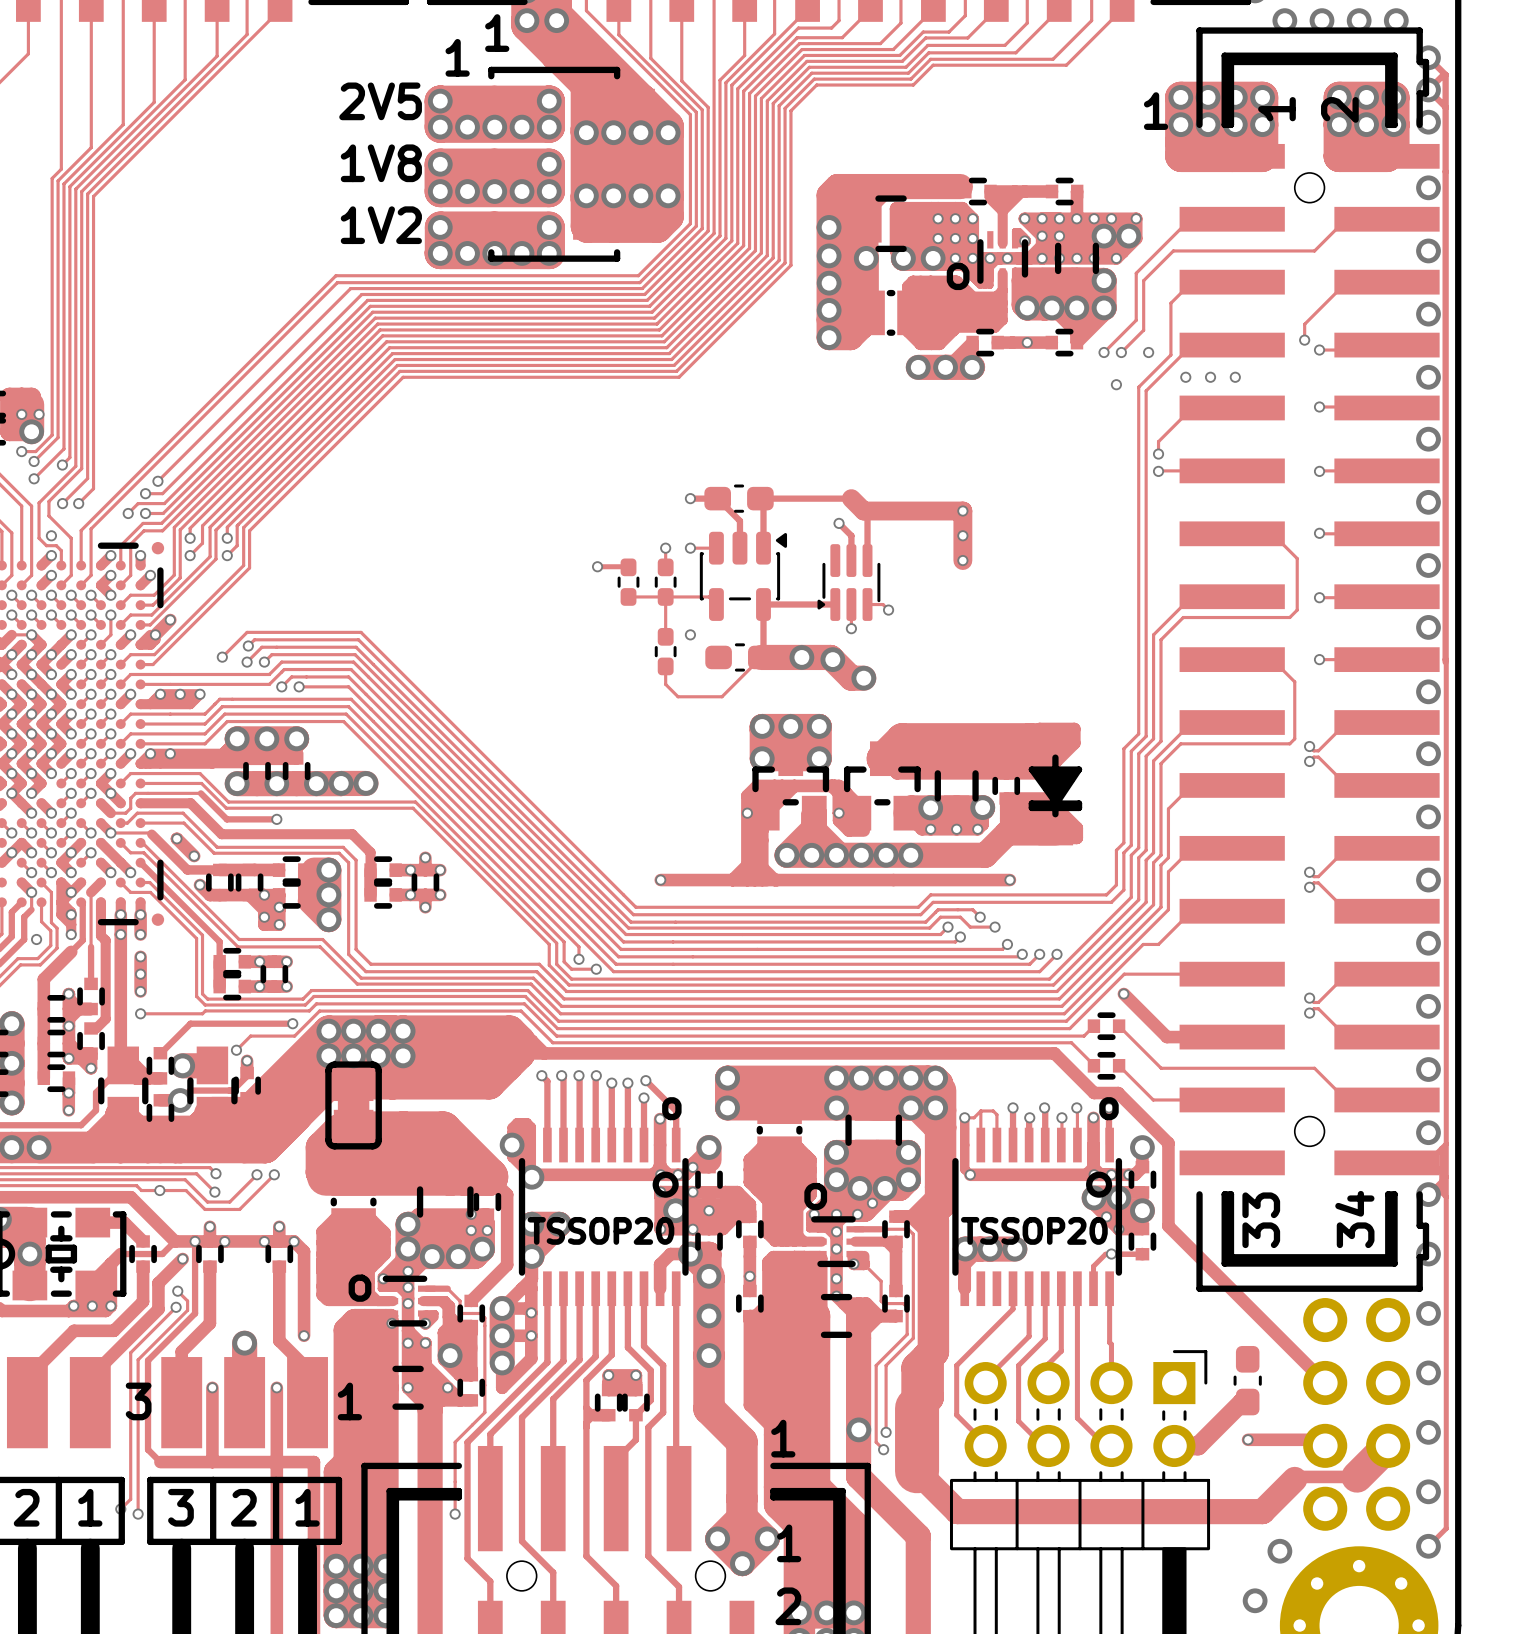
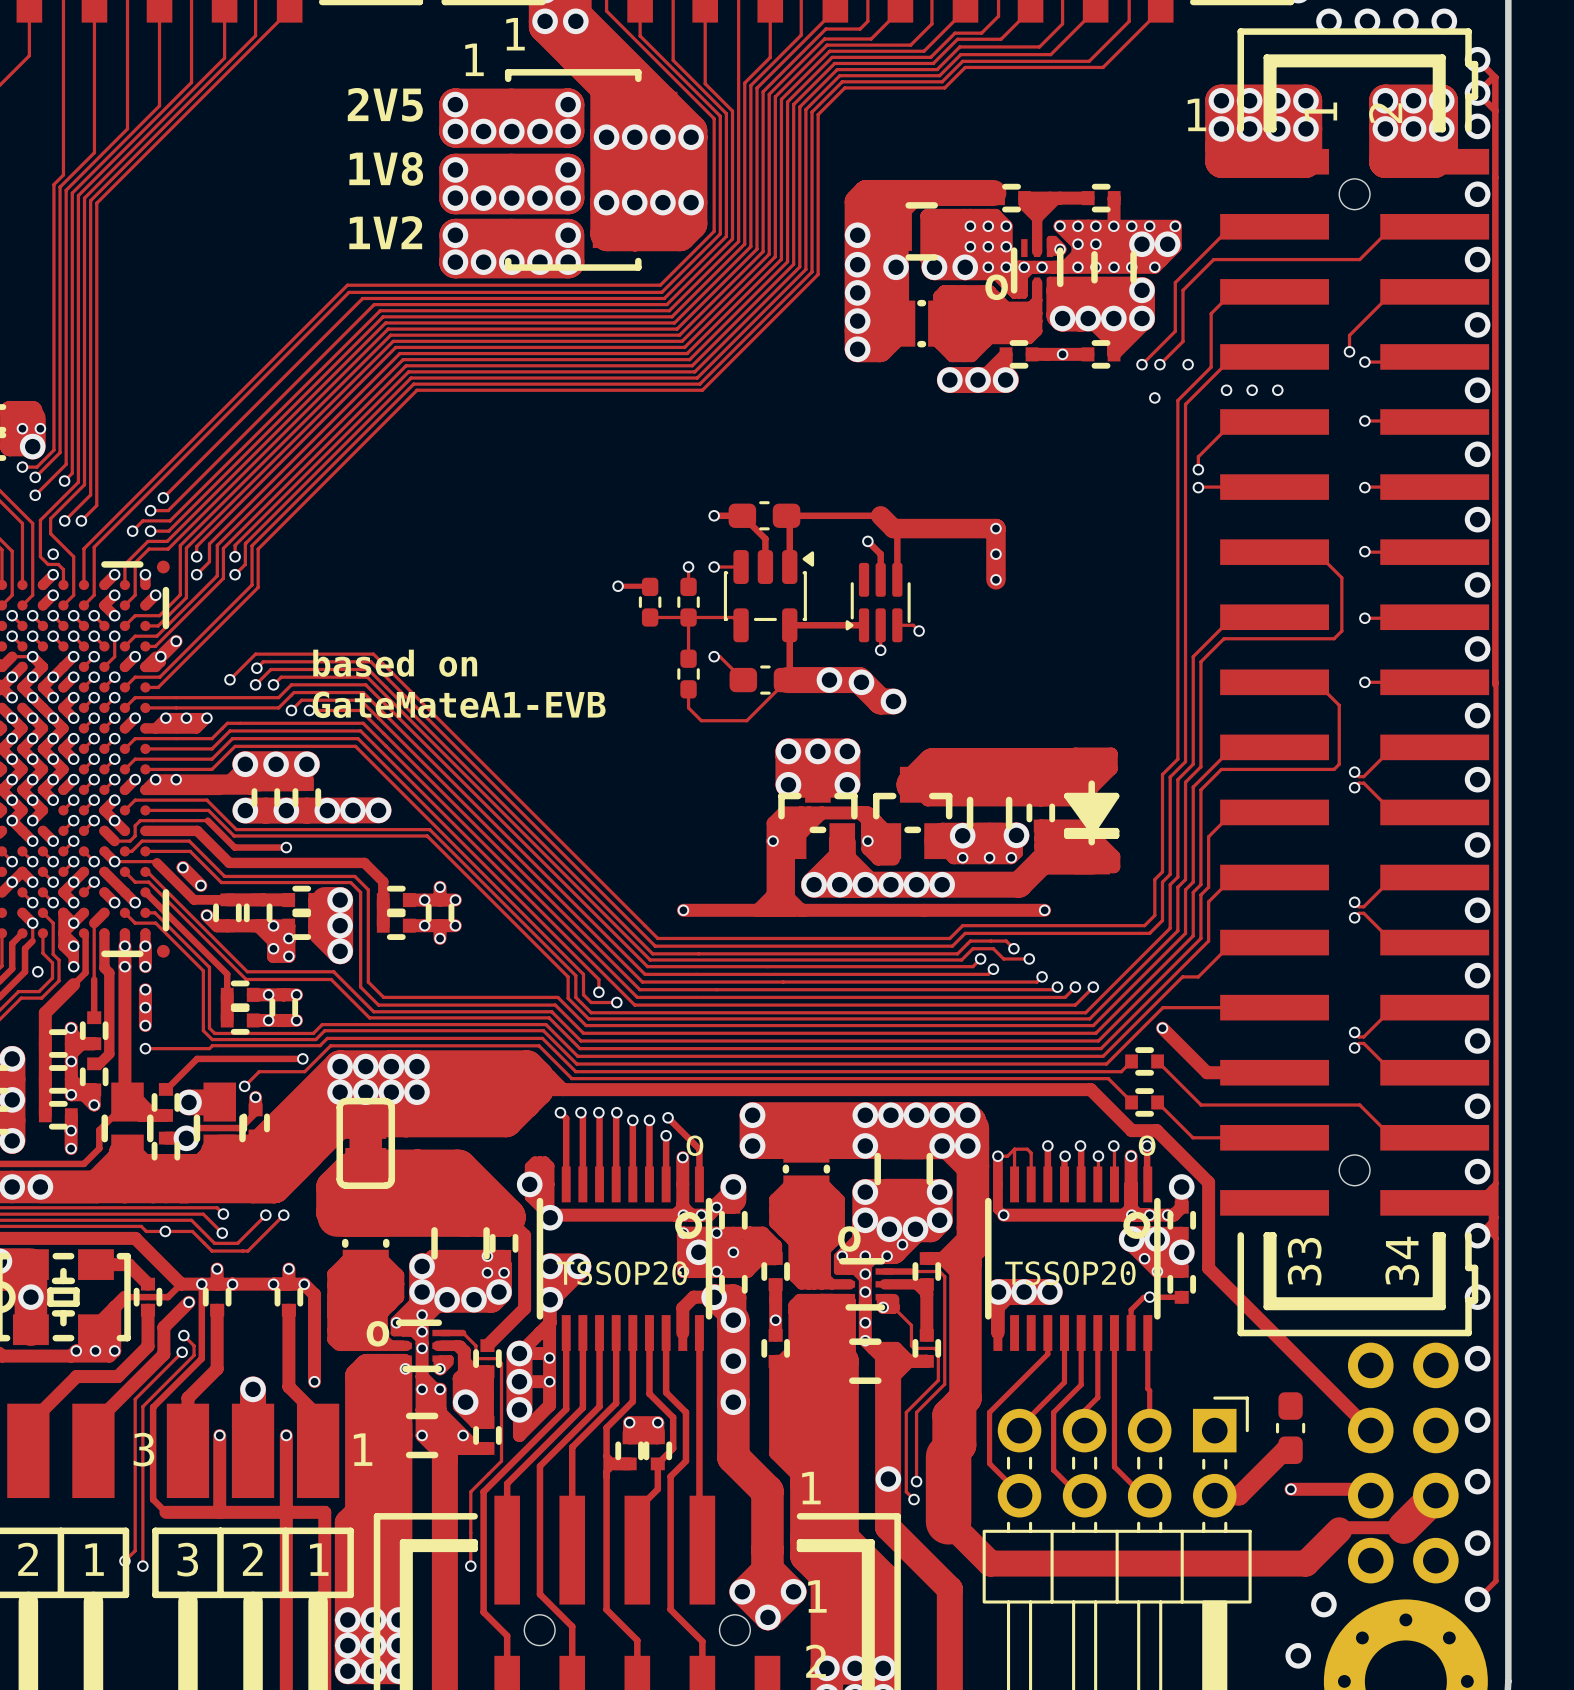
track: none -> (714, 656) (719, 656) (743, 680)
text: none -> based on (395, 663)
text: none -> GateMateA1-EVB (459, 704)

